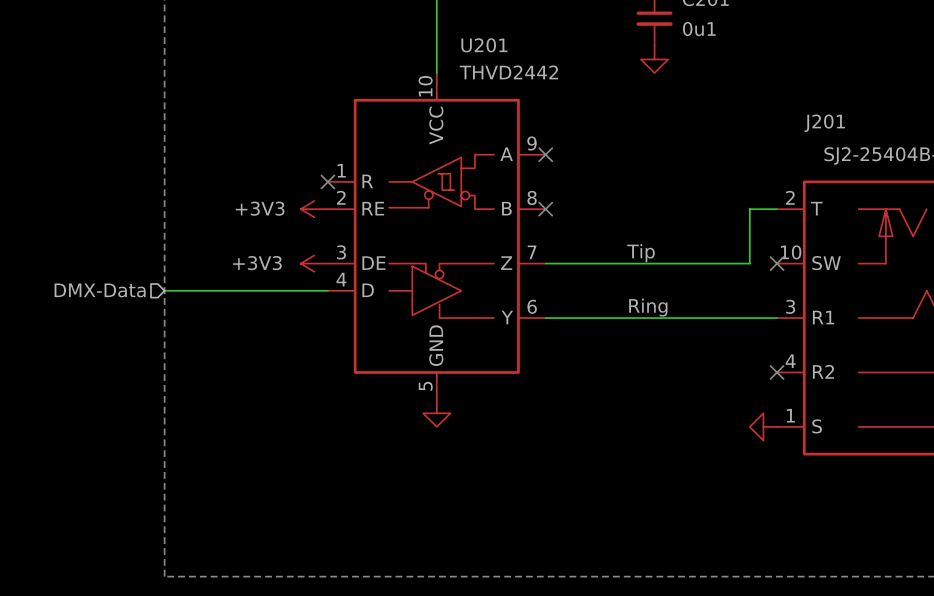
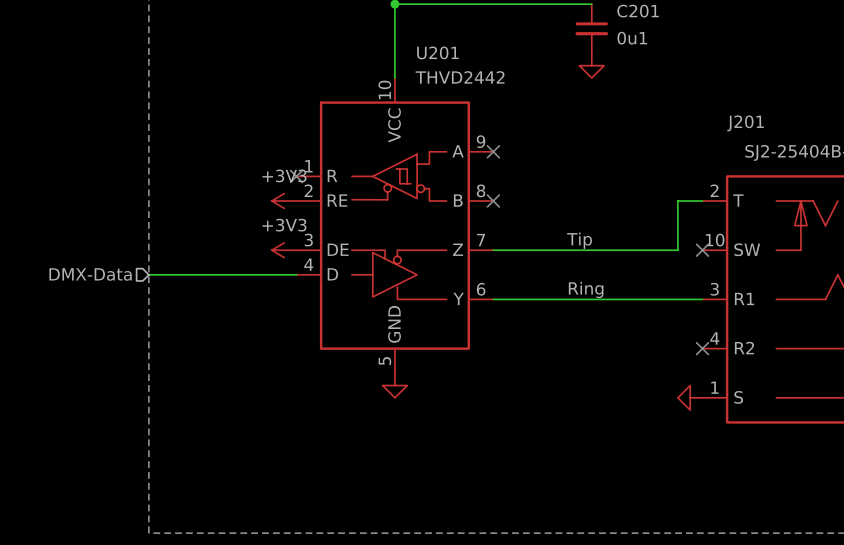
power symbol text position: +3V3 (260, 208) -> +3V3 (284, 175)
power symbol text position: +3V3 (257, 263) -> +3V3 (284, 225)

